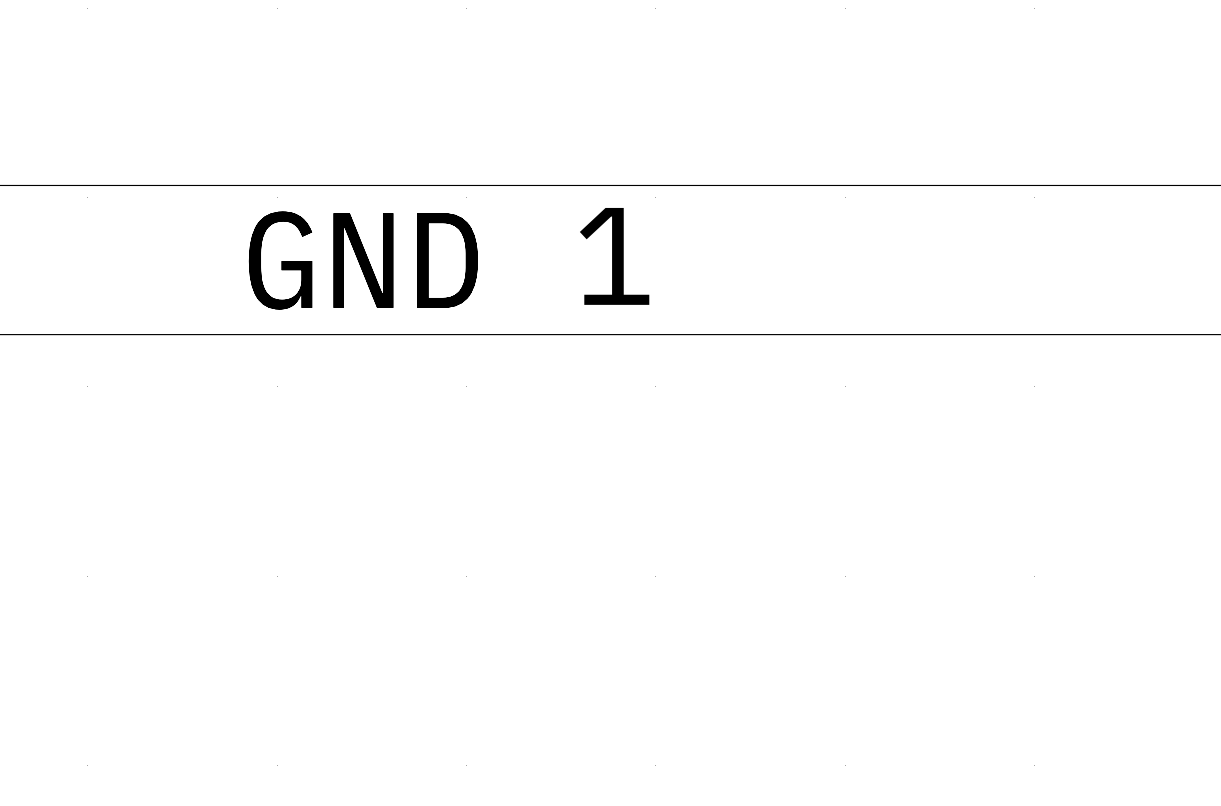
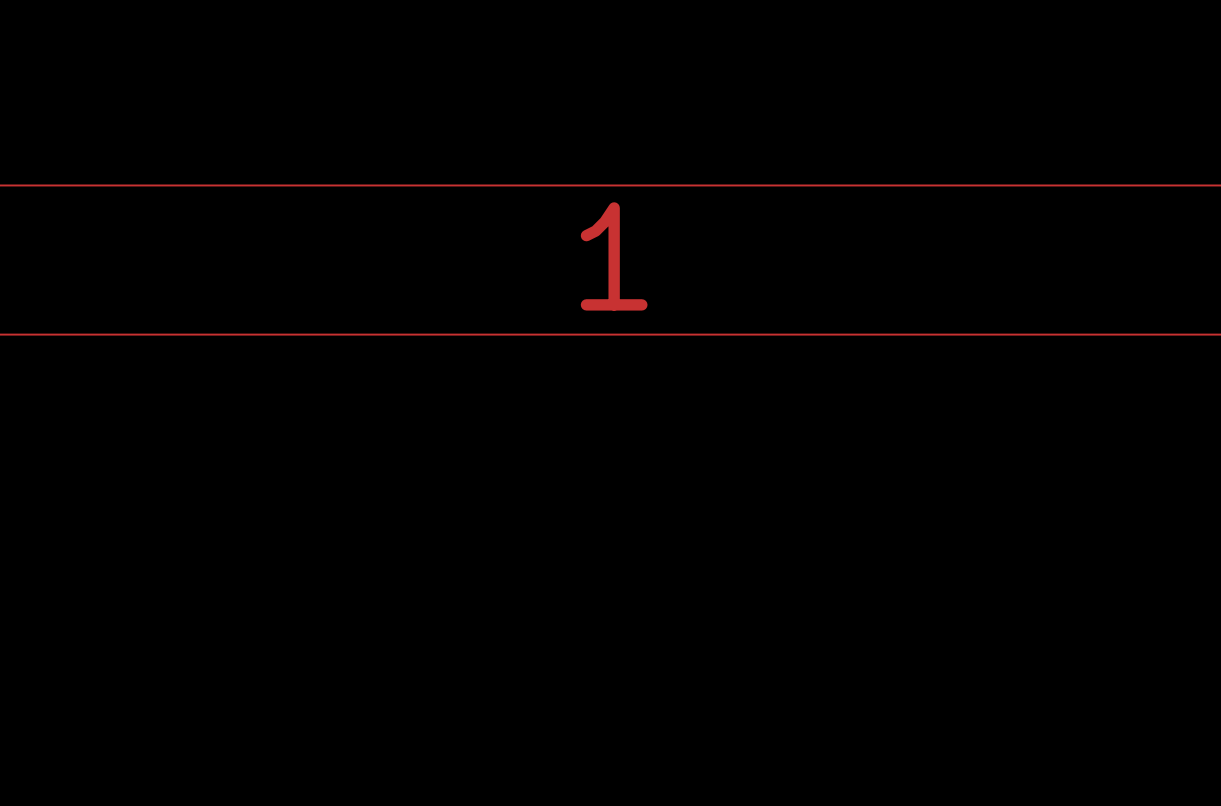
label: GND (363, 260) -> none

